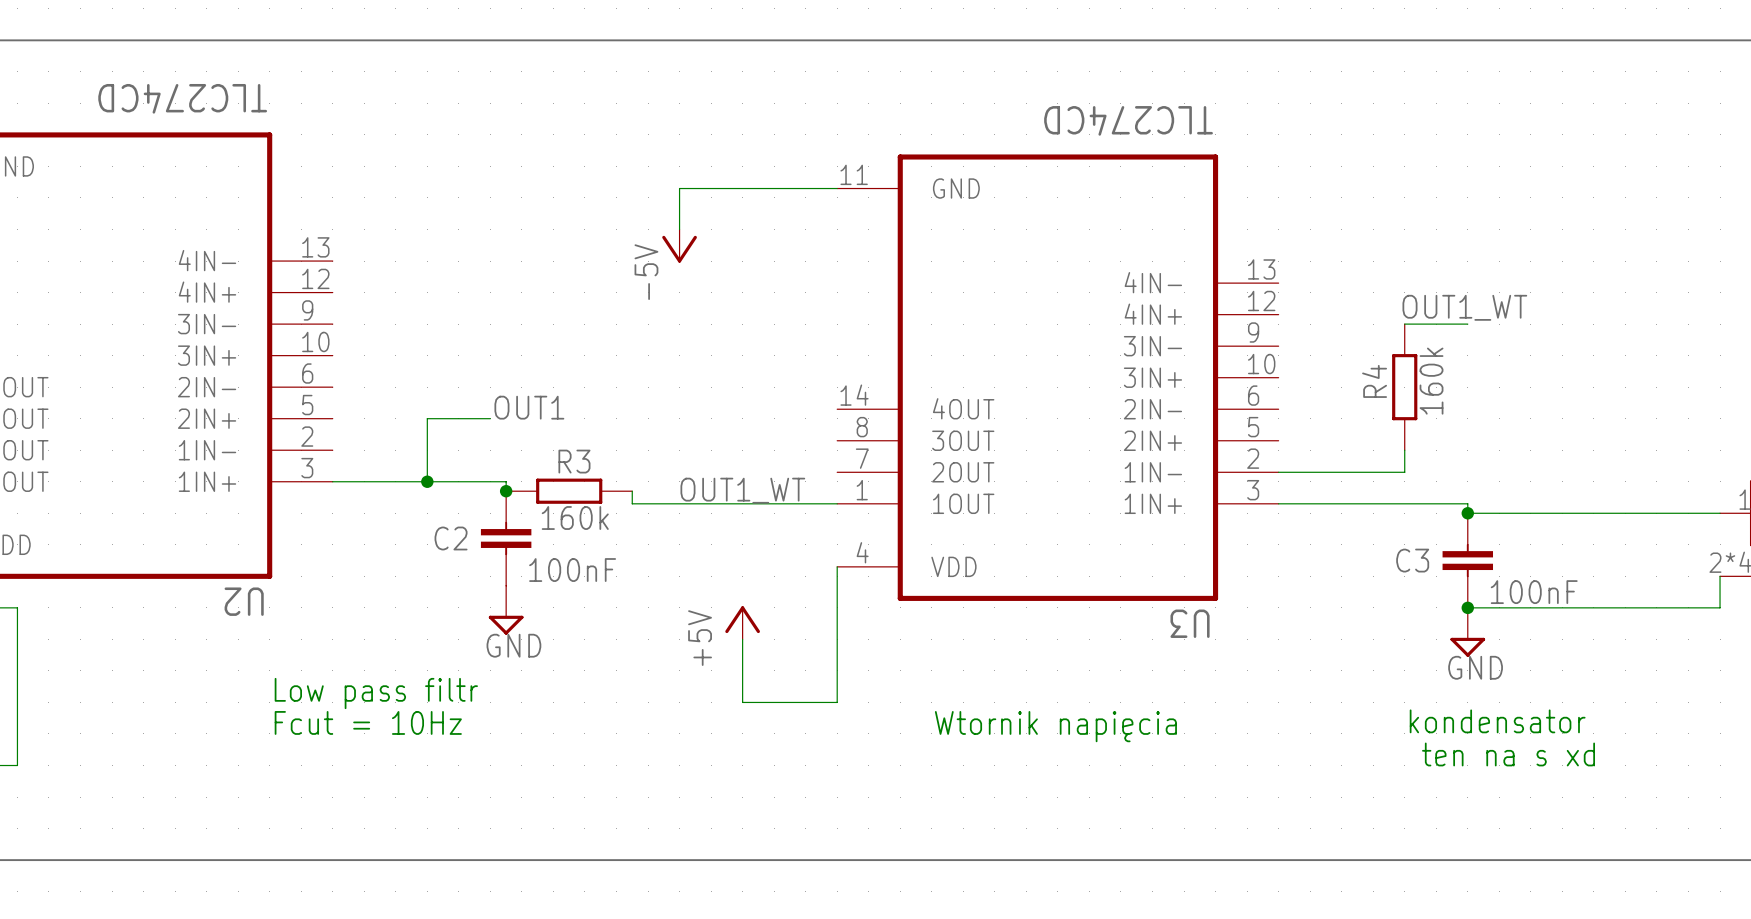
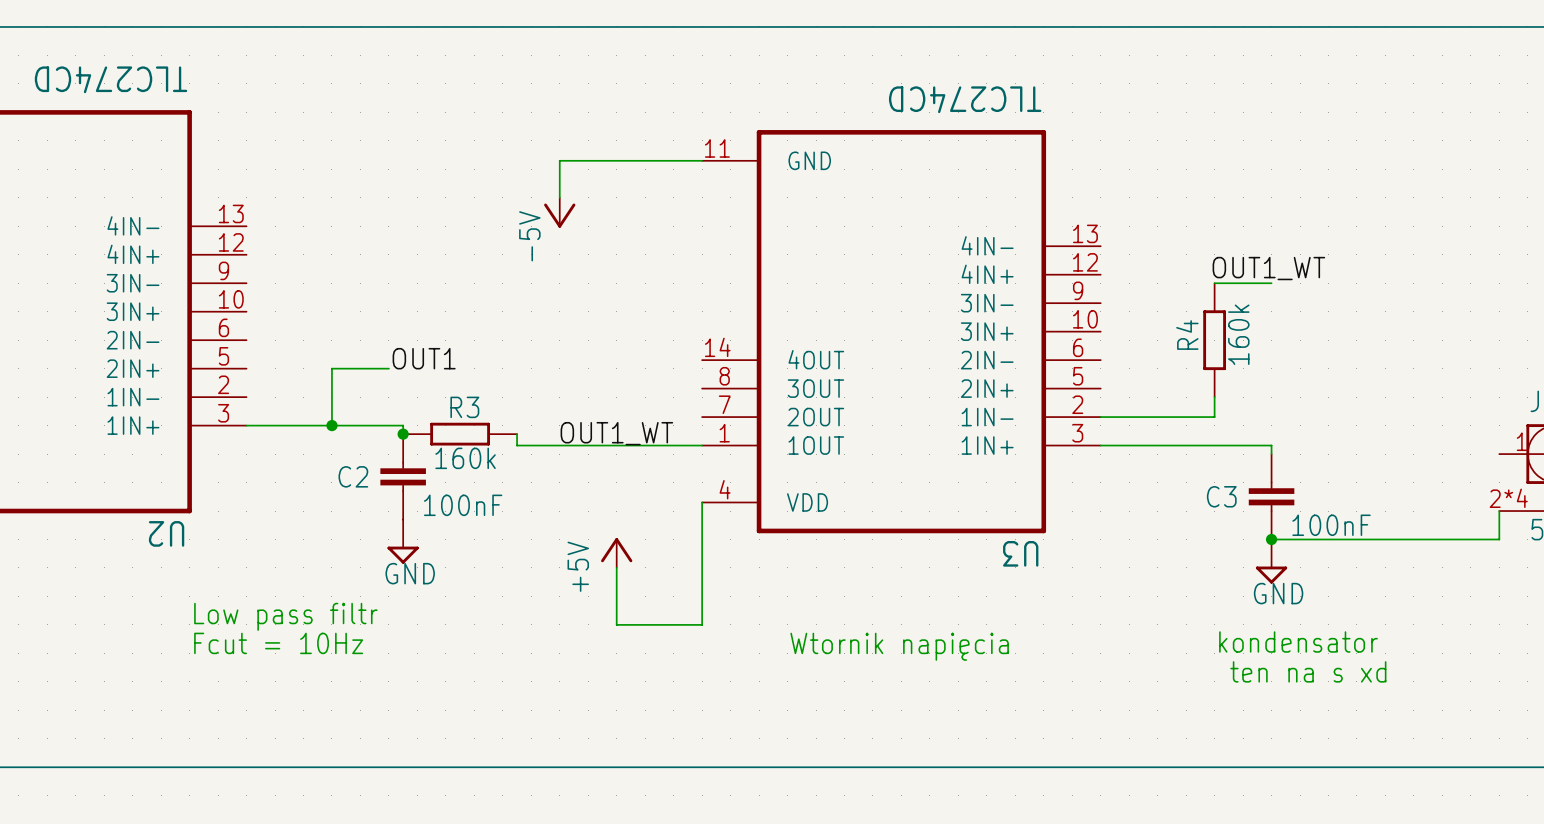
wire: (1467, 513) (1720, 513) -> none
junction: (1467, 513) -> none

